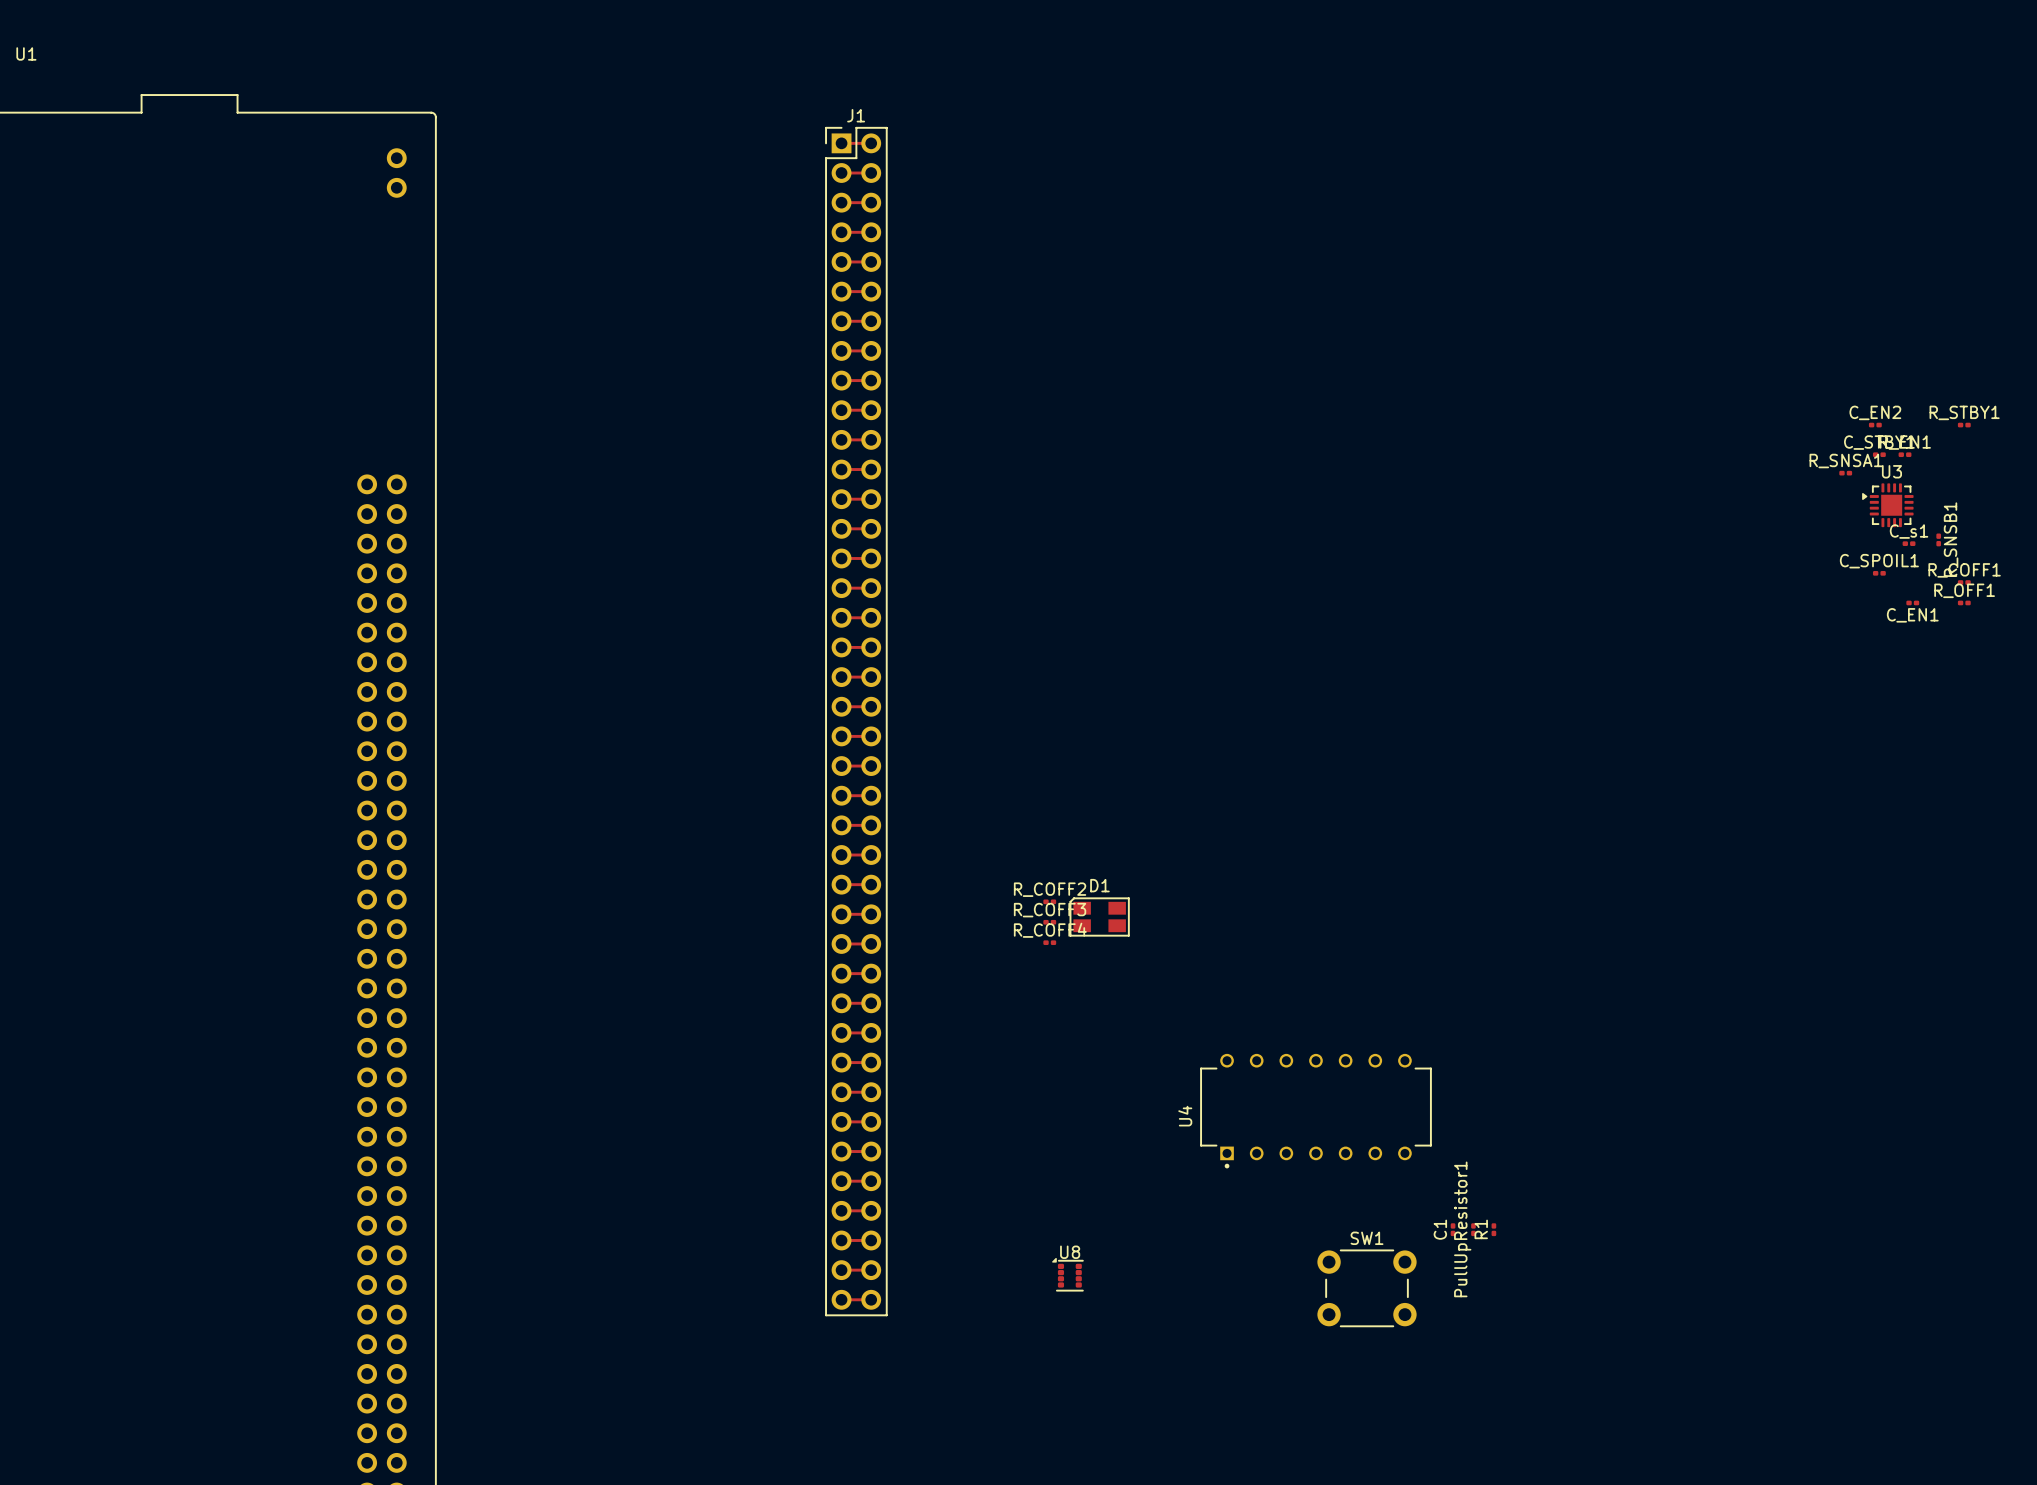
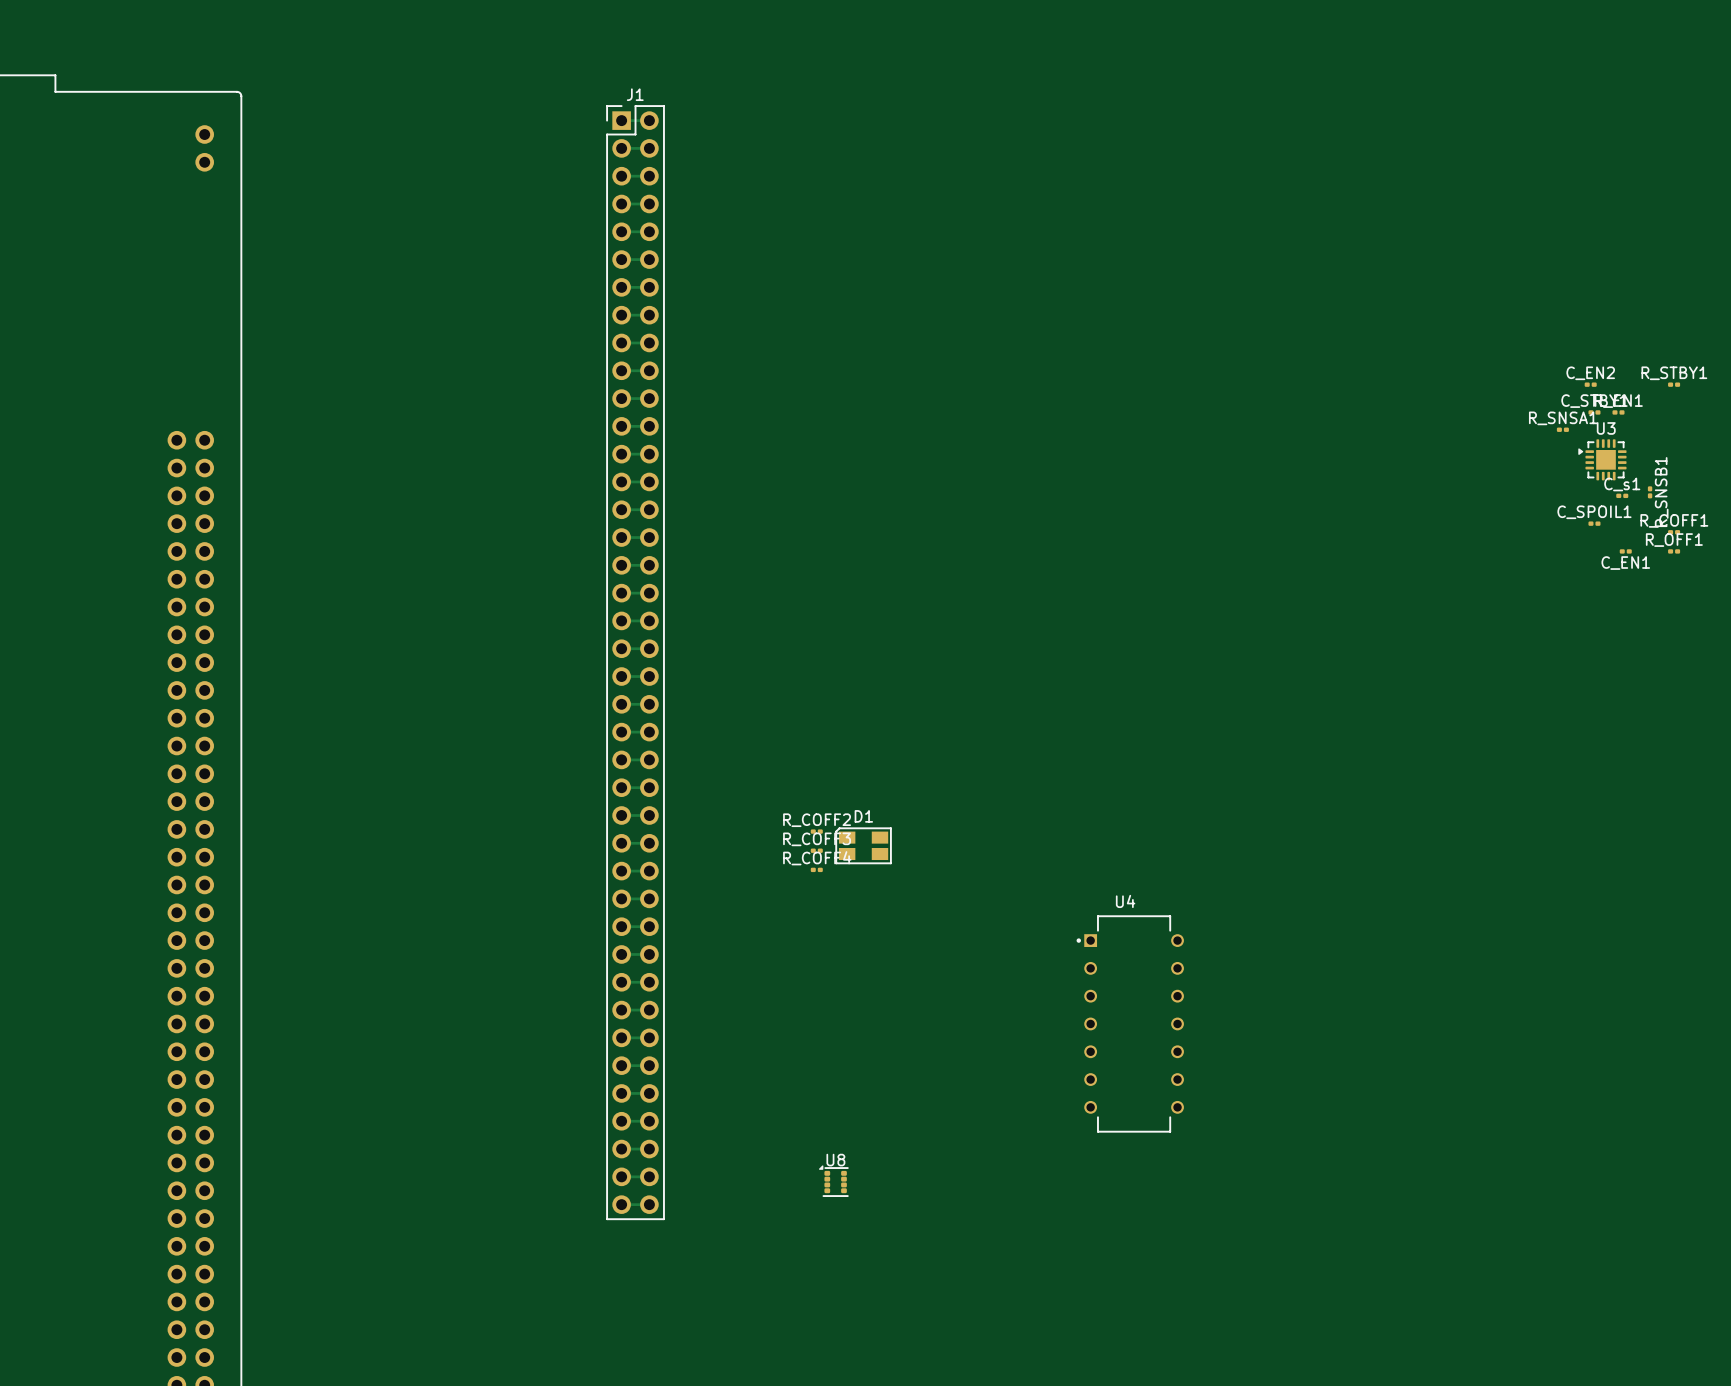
U4 rotation: 0° (1315, 1111) -> 90° clockwise (1130, 1023)
C1: (1453, 1229) -> none
PullUpResistor1: (1473, 1229) -> none
R1: (1493, 1229) -> none
SW1: (1367, 1288) -> none

